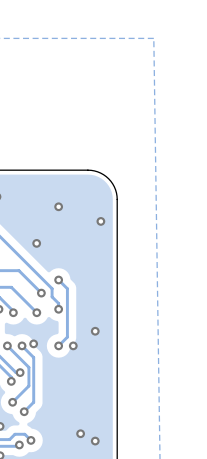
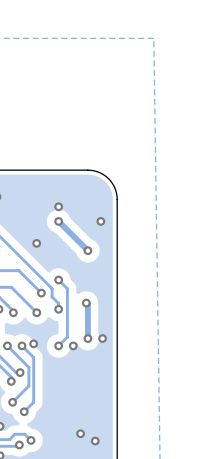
track: none -> (58, 221) (87, 250)
via: none -> (58, 221)
via: none -> (87, 250)
track: none -> (86, 303) (87, 304) (87, 338)
via: none -> (86, 303)
via: (95, 331) -> none
via: none -> (87, 338)
via: none -> (102, 338)

